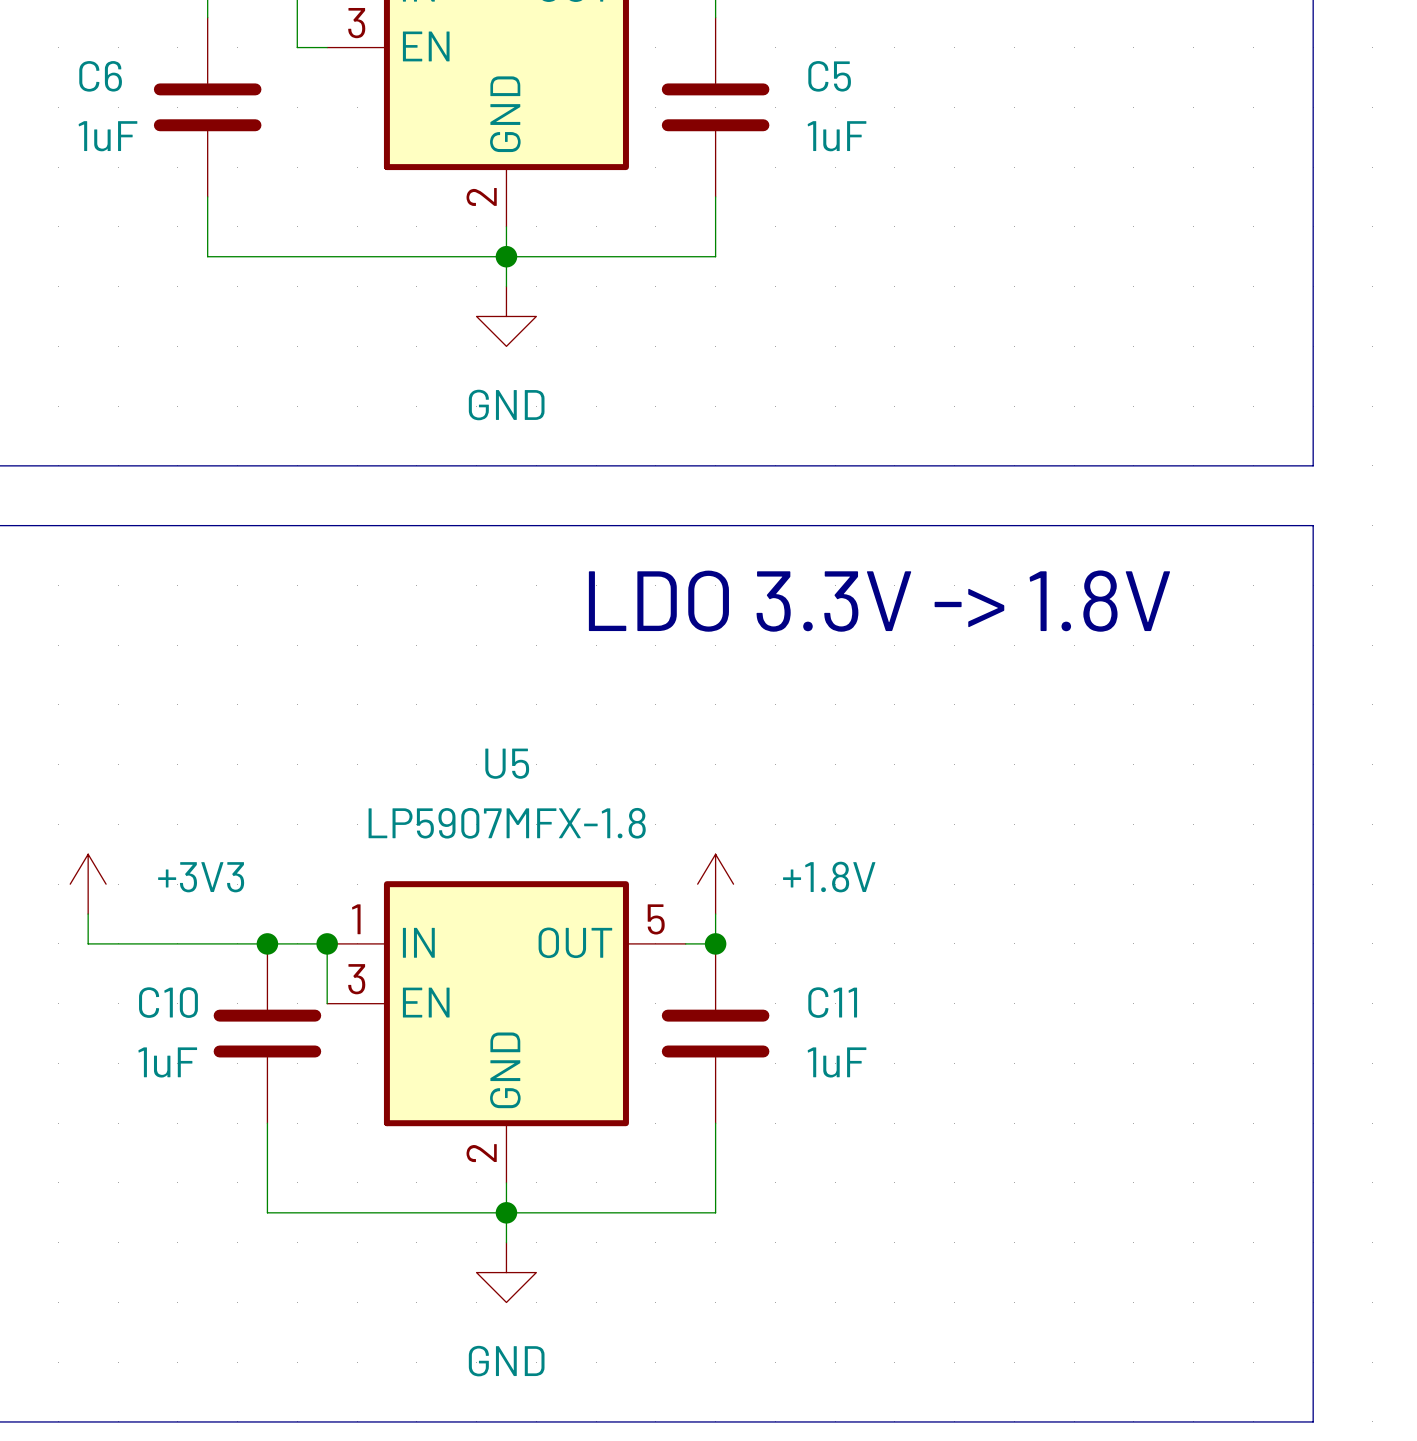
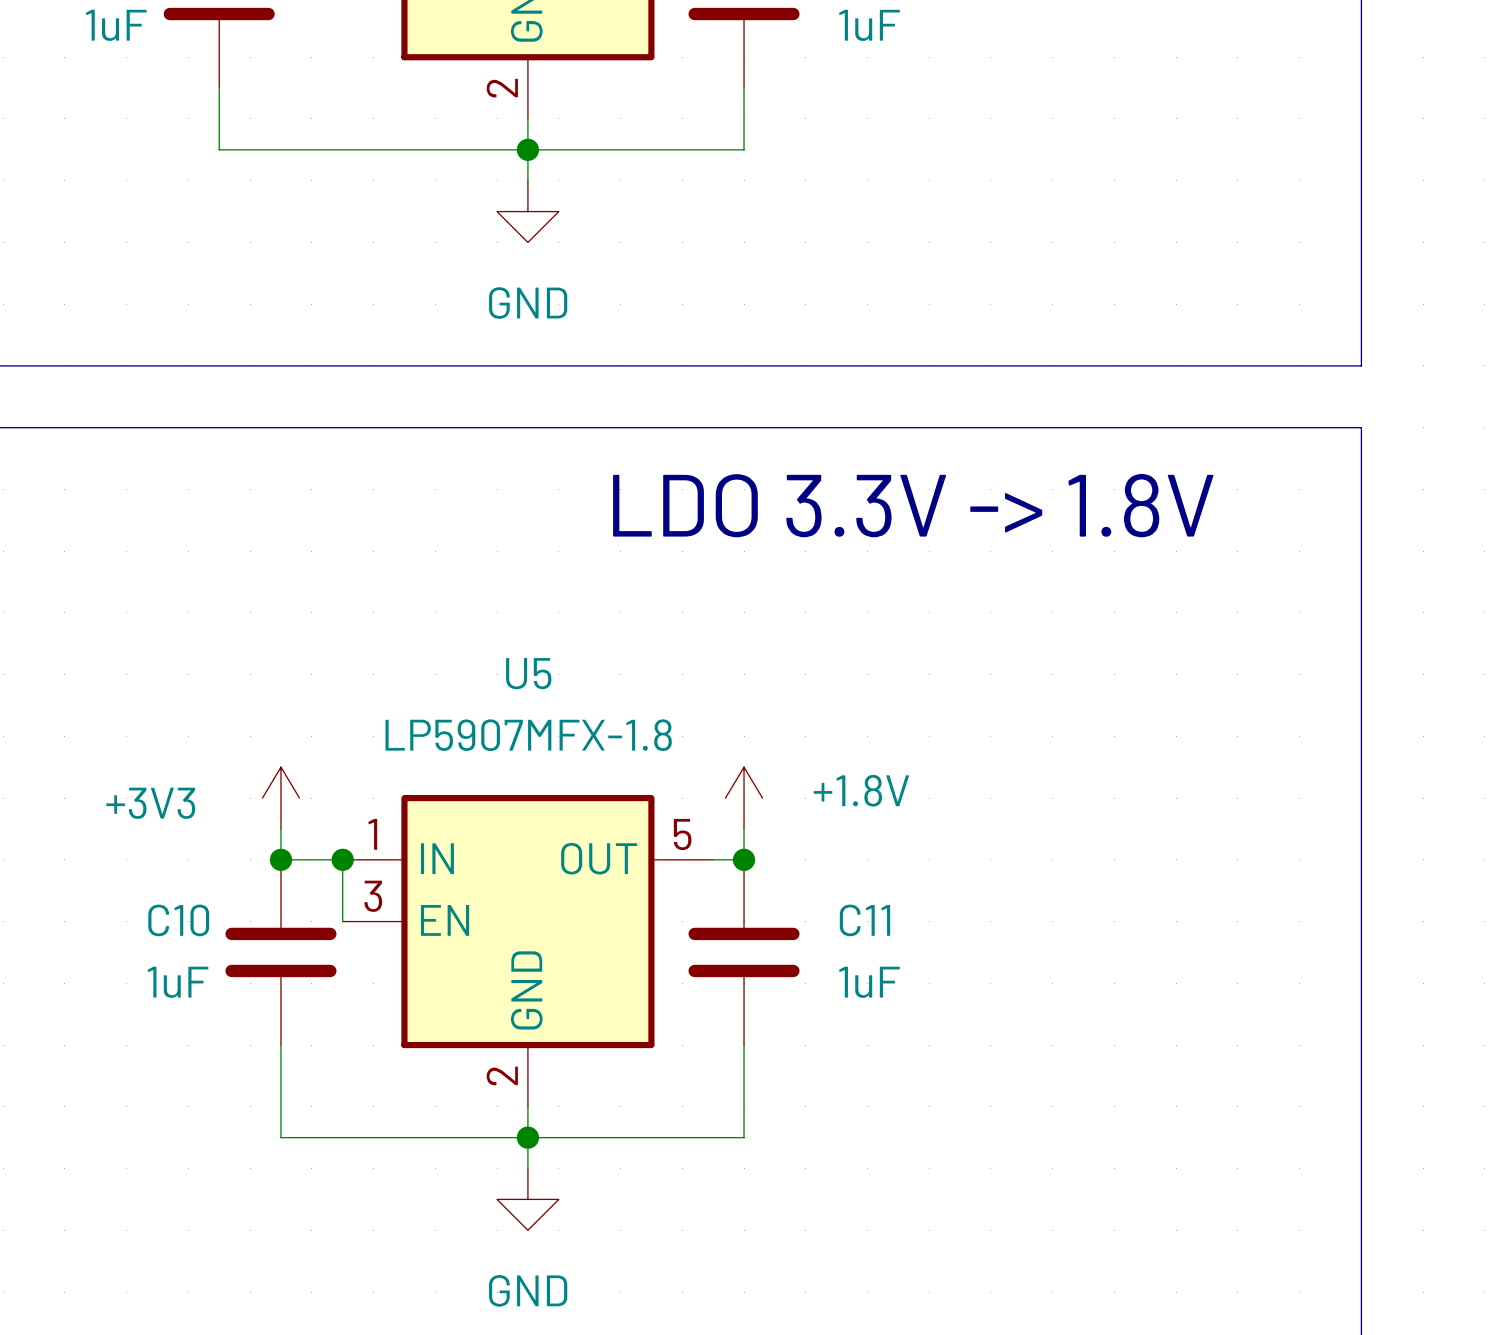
power symbol text position: +3V3 (201, 877) -> +3V3 (150, 803)
power symbol position: +3V3 (88, 884) -> +3V3 (280, 798)
wire: (88, 914) (88, 943) (267, 943) -> (280, 828) (280, 859)

